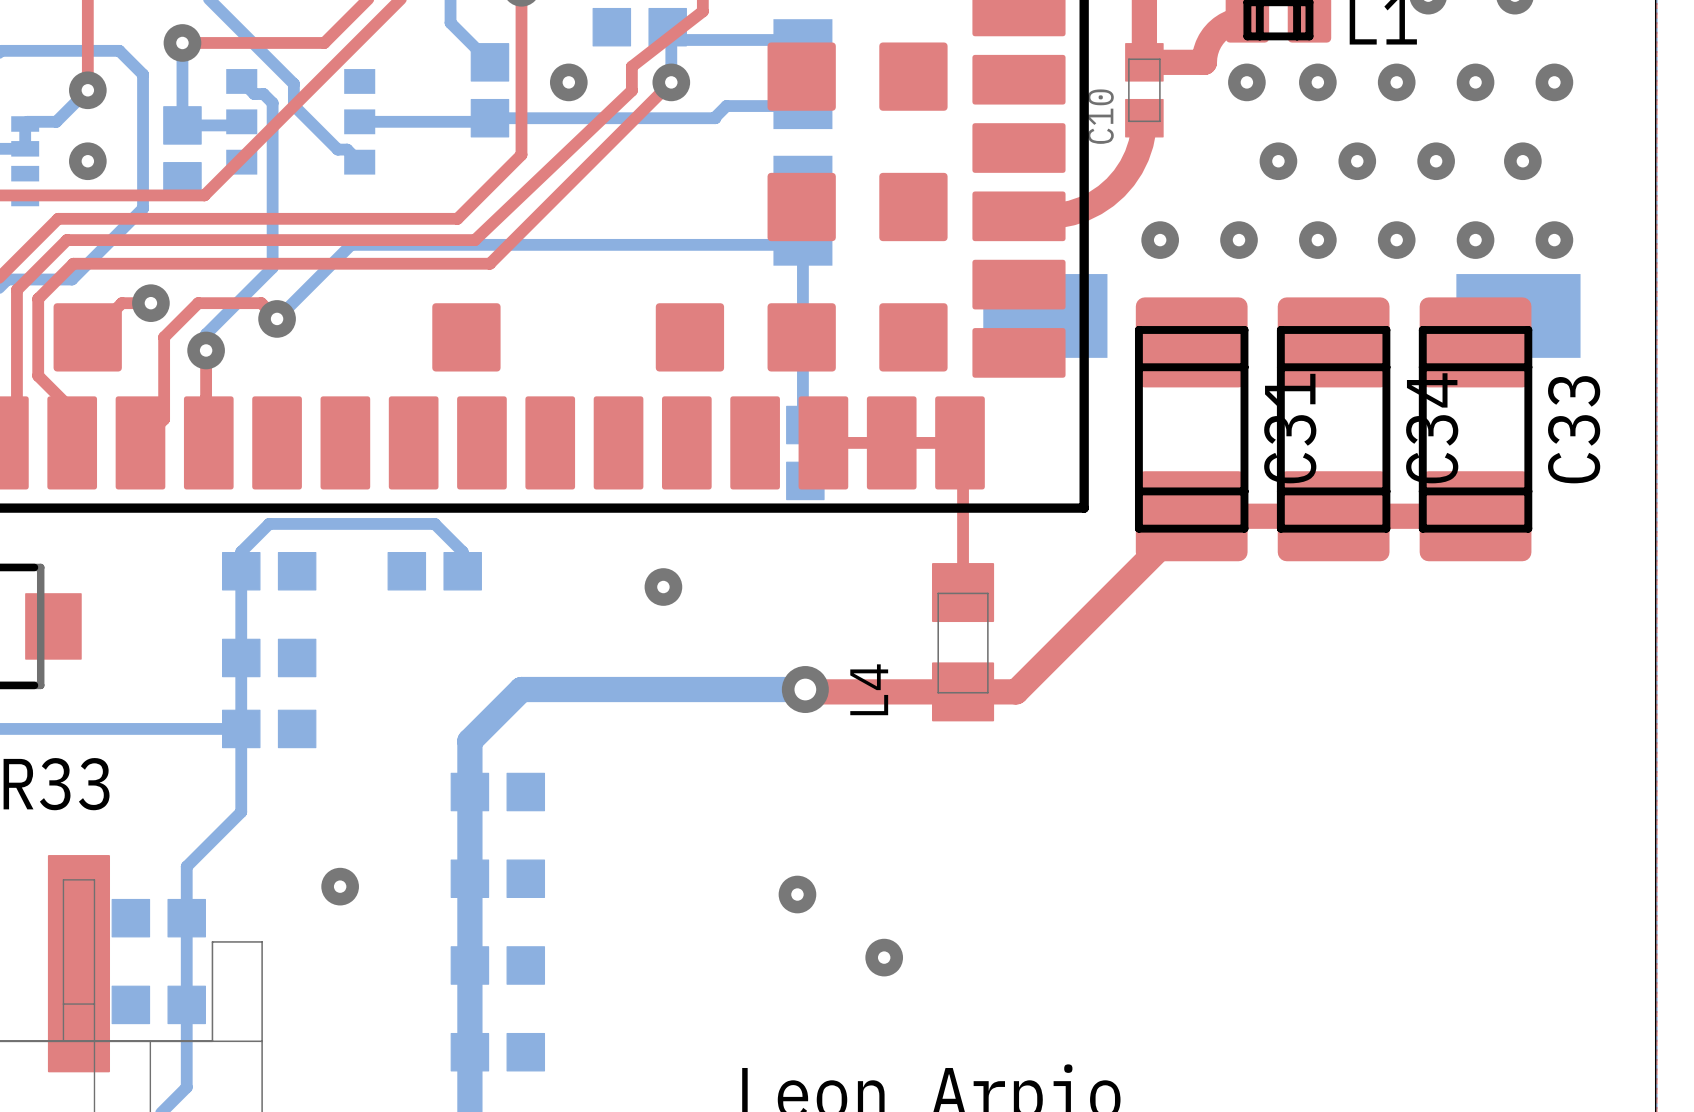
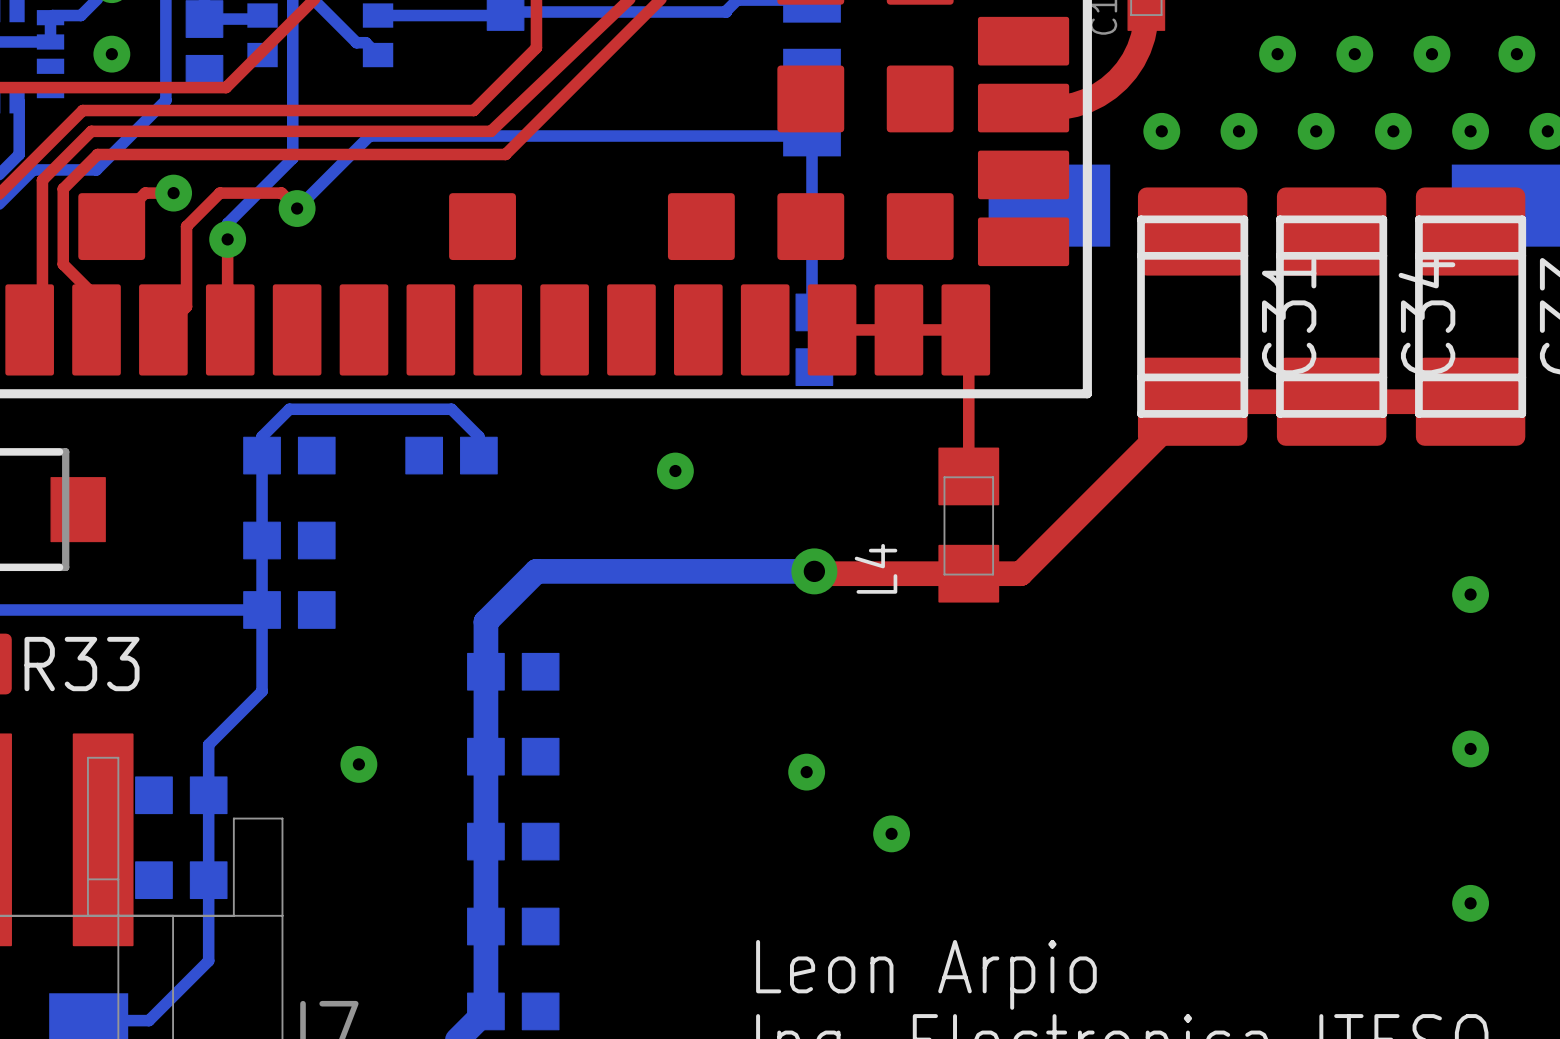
via: none -> (1470, 594)
via: none -> (1470, 748)
via: none -> (1470, 903)

